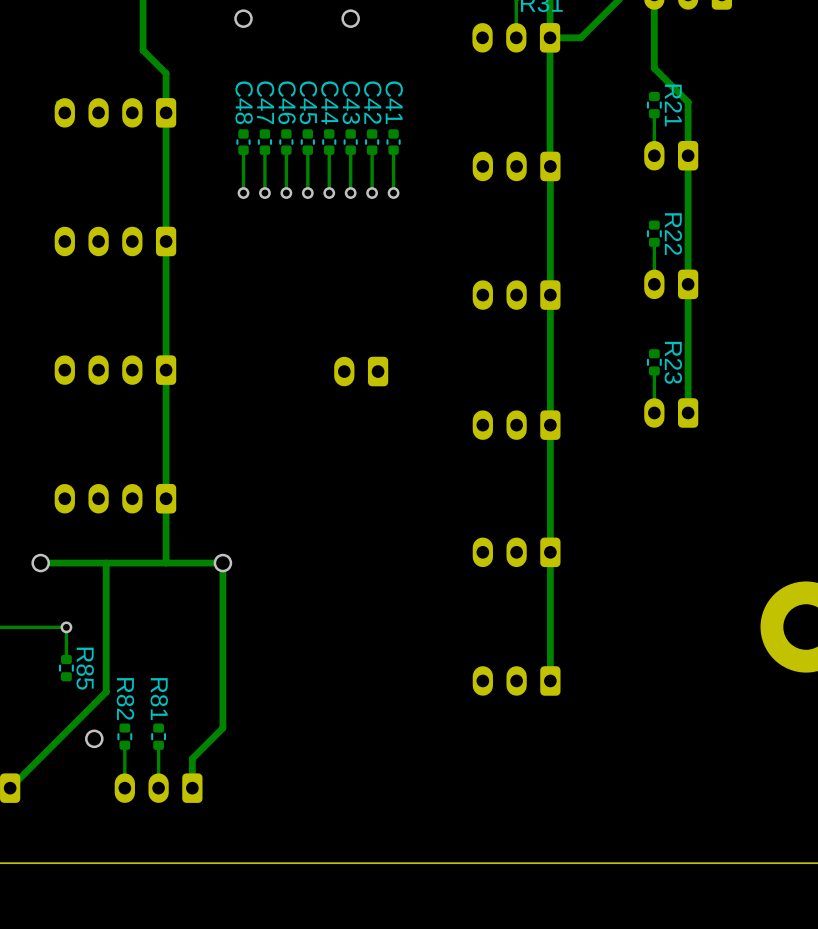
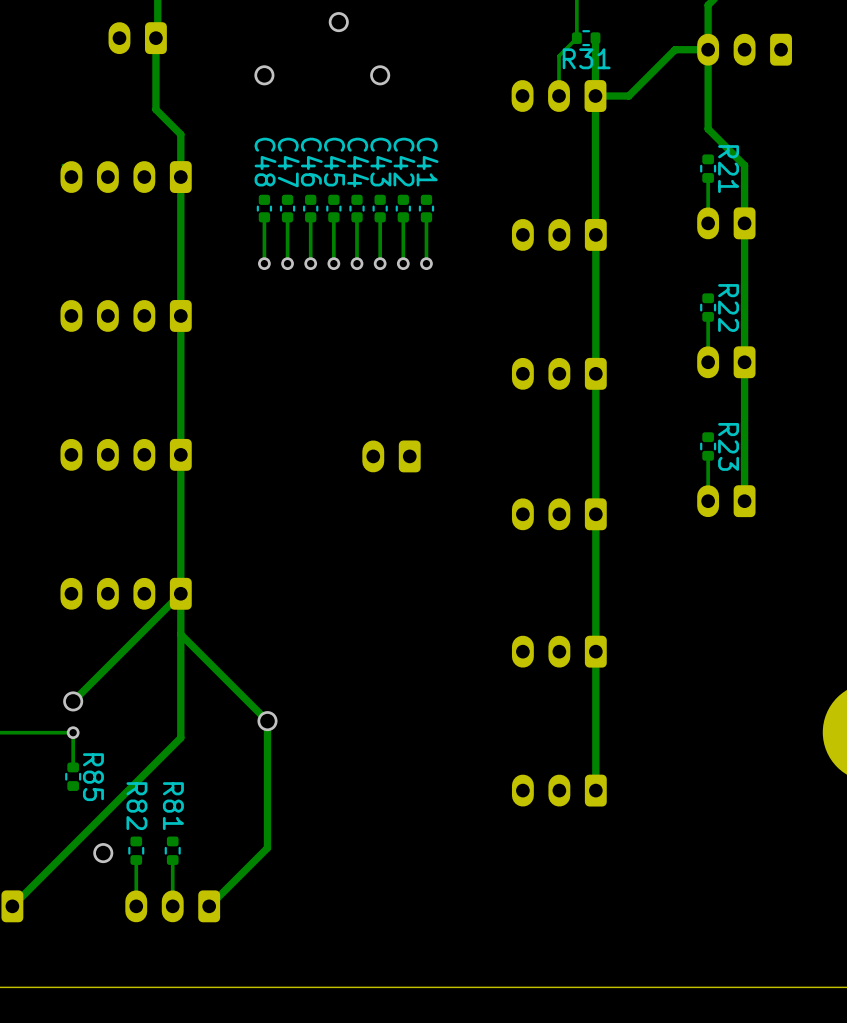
track: none -> (180, 593) (73, 701)
track: none -> (180, 634) (267, 721)
track: (40, 563) (222, 563) (222, 728) (192, 758) (192, 788) -> (267, 720) (267, 848) (209, 906)
via position: (40, 563) -> (73, 701)
track: (106, 563) (106, 692) -> (180, 663) (180, 737) (116, 802)
via position: (222, 563) -> (267, 721)

